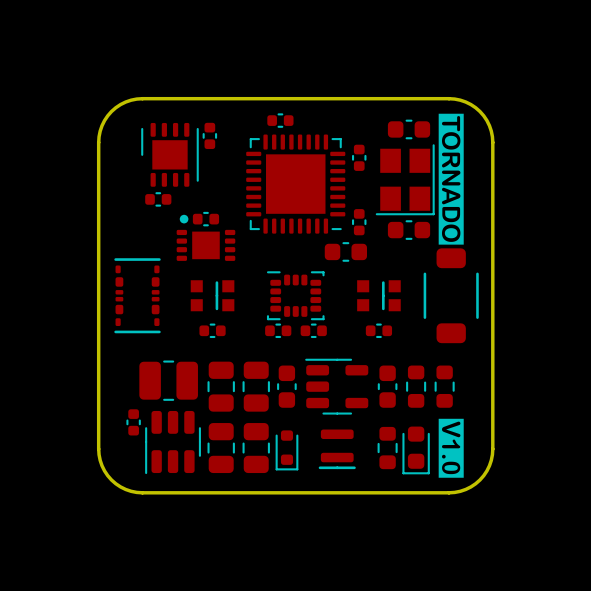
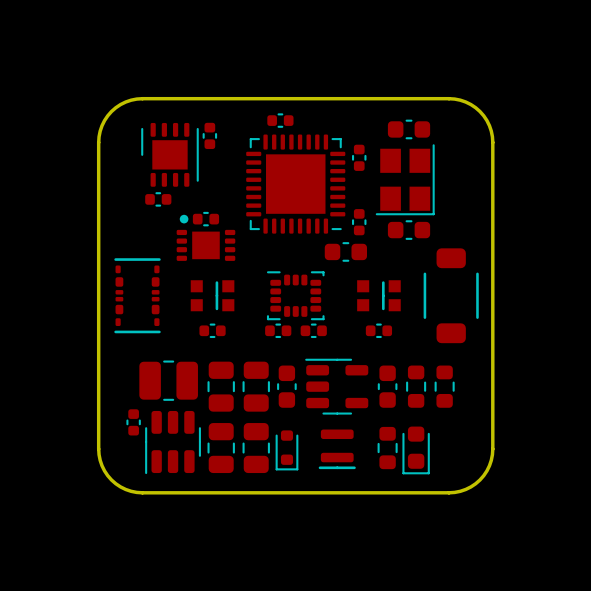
drawing: [438, 113, 464, 245] -> none
drawing: [438, 418, 464, 478] -> none

